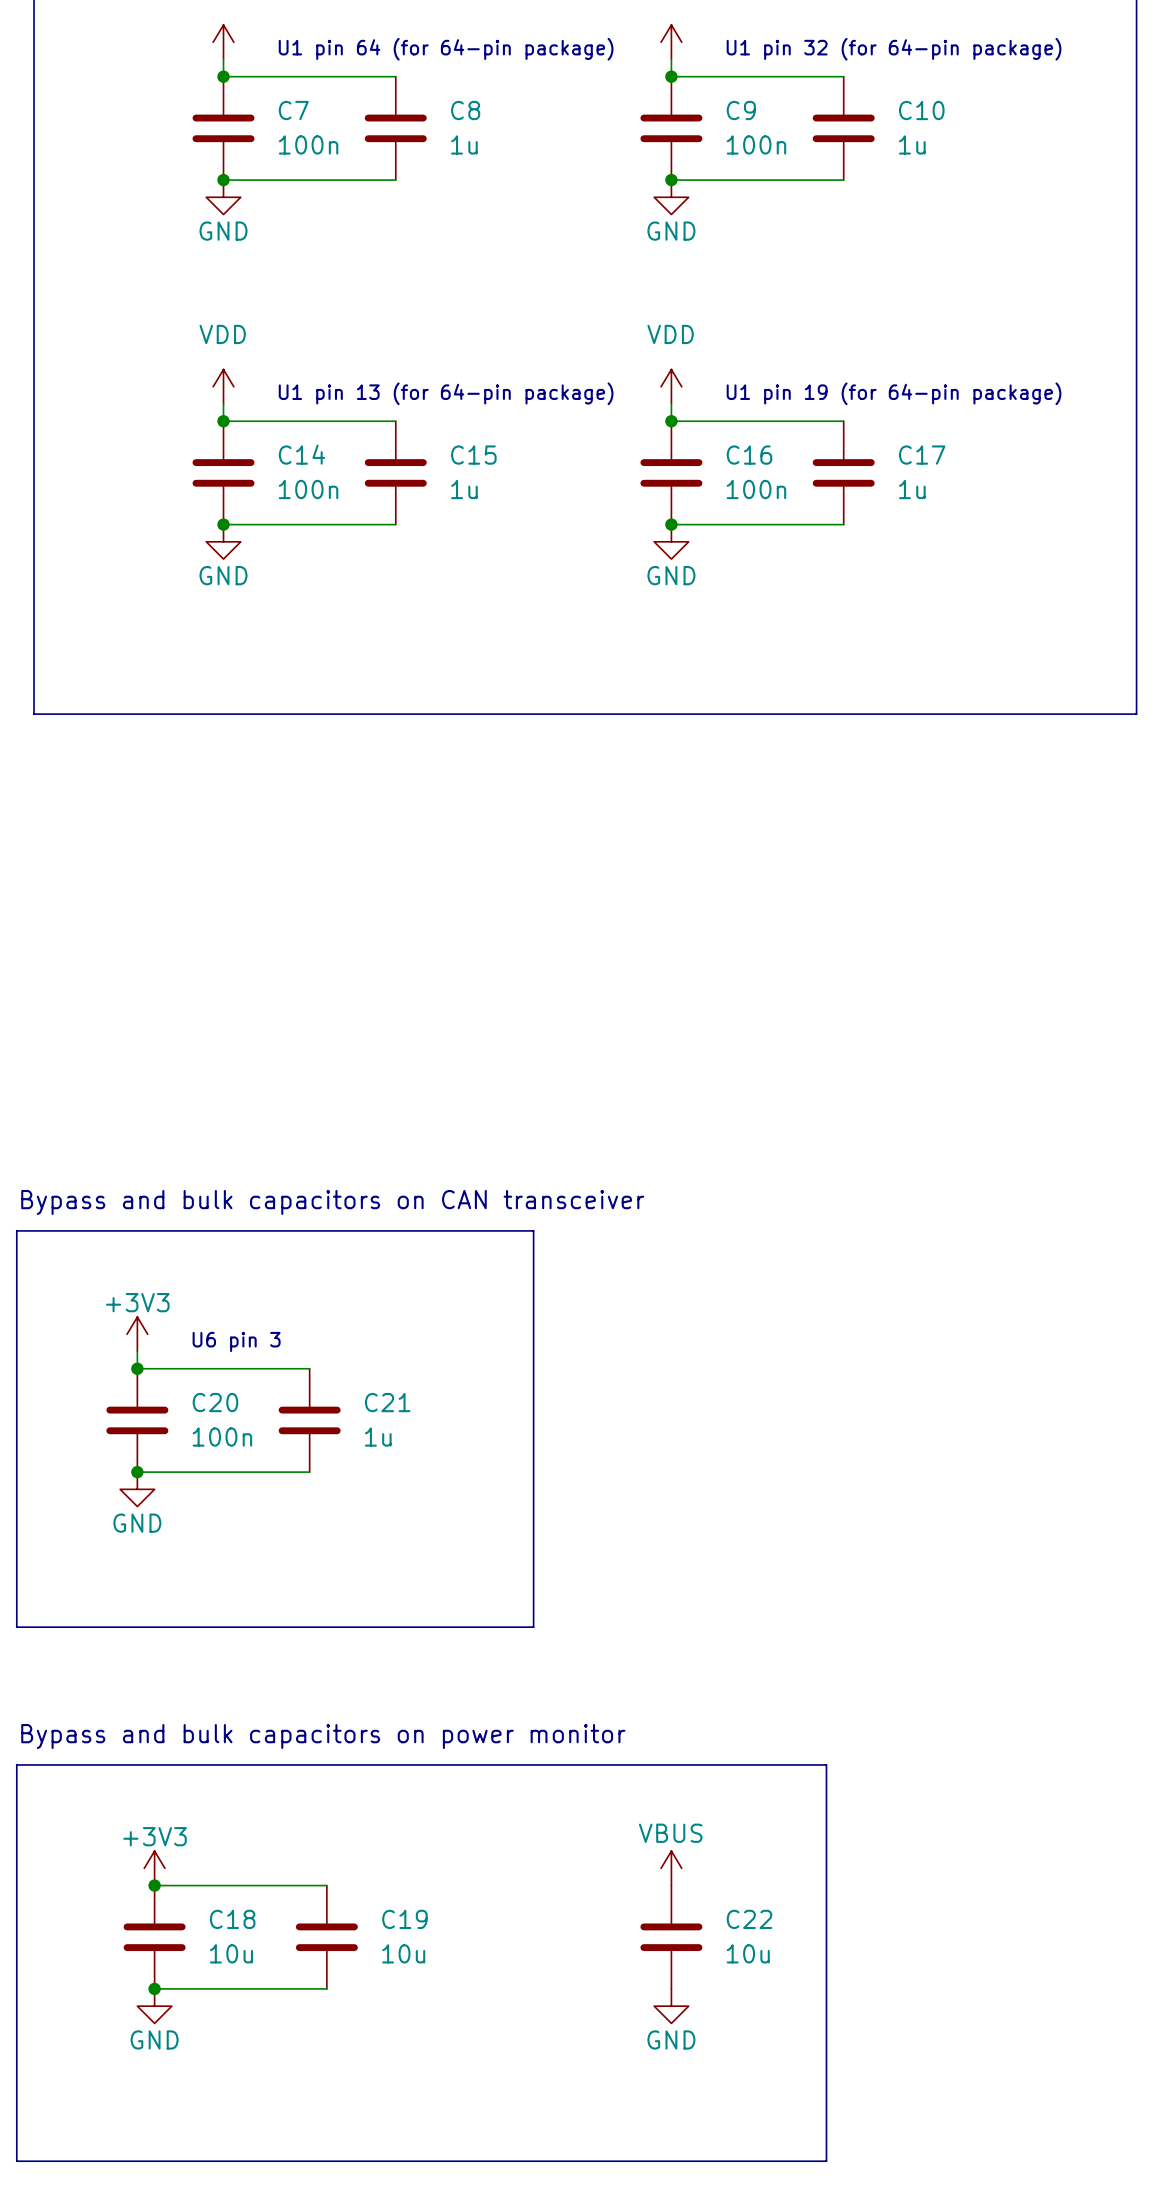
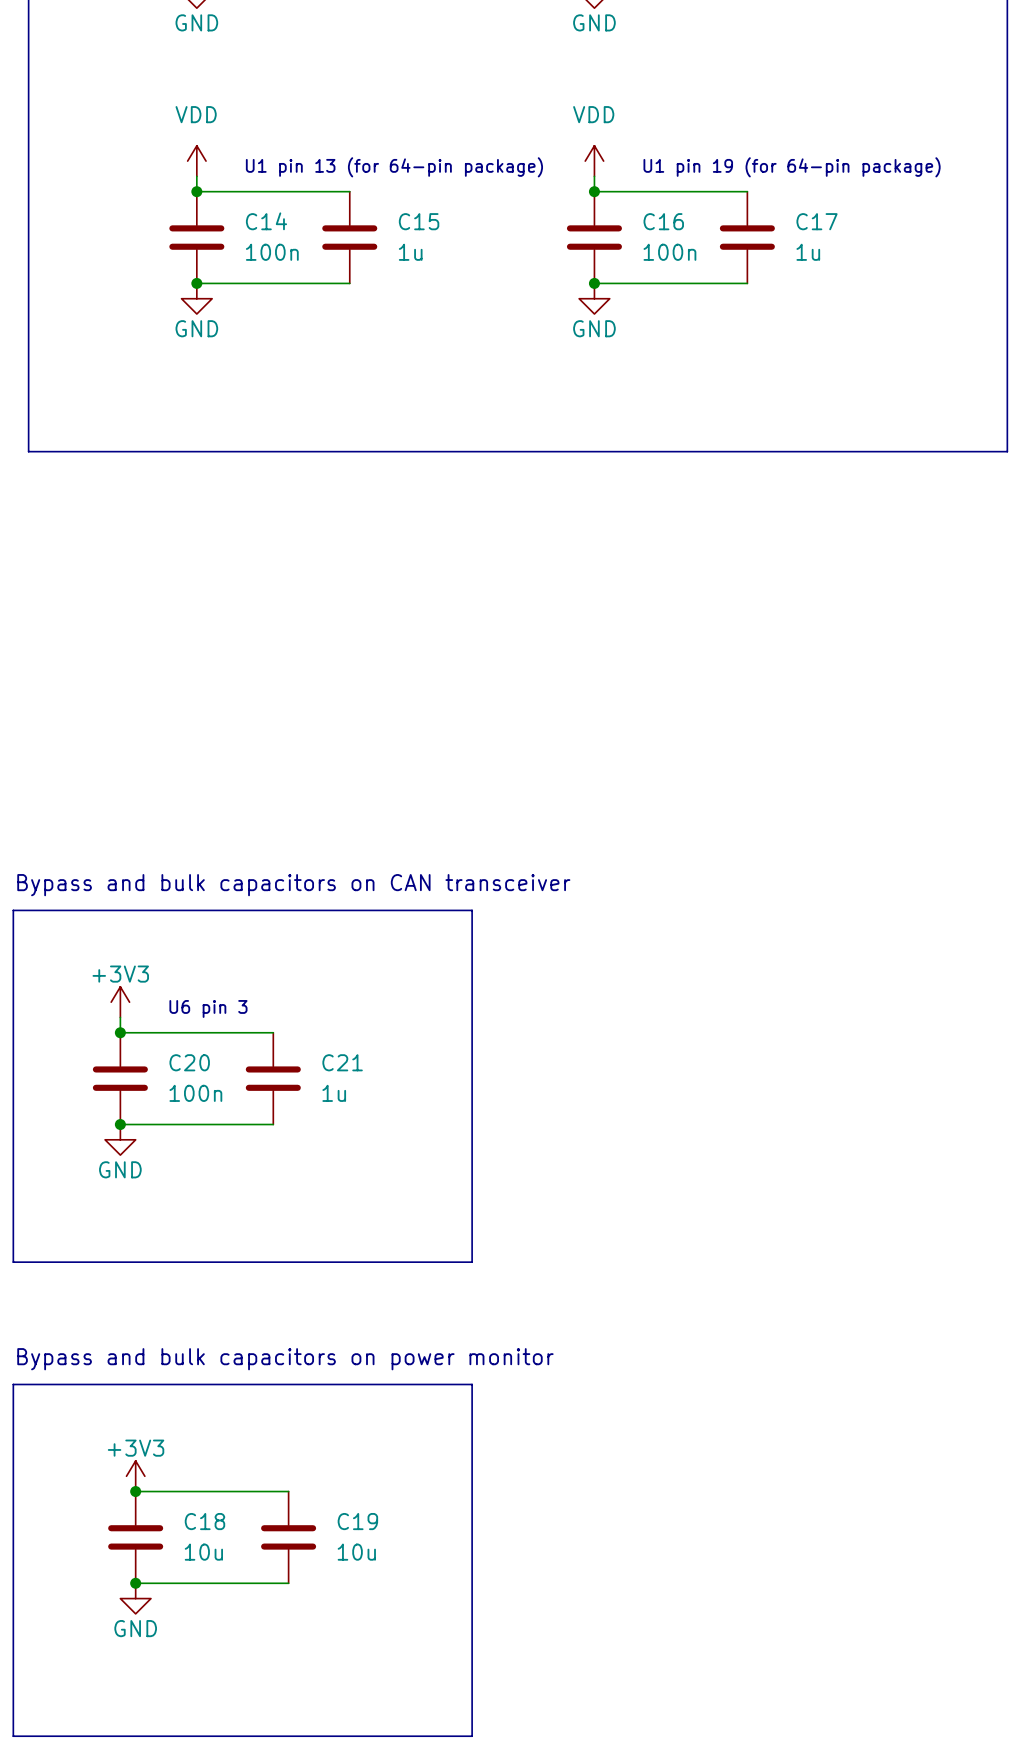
line: (533, 1764) (826, 1764) (826, 2161) (533, 2161) -> (472, 1384) (472, 1736)
power symbol: VBUS (671, 1868) -> none
C22: 10u (671, 1937) -> none
power symbol: GND (671, 2006) -> none

